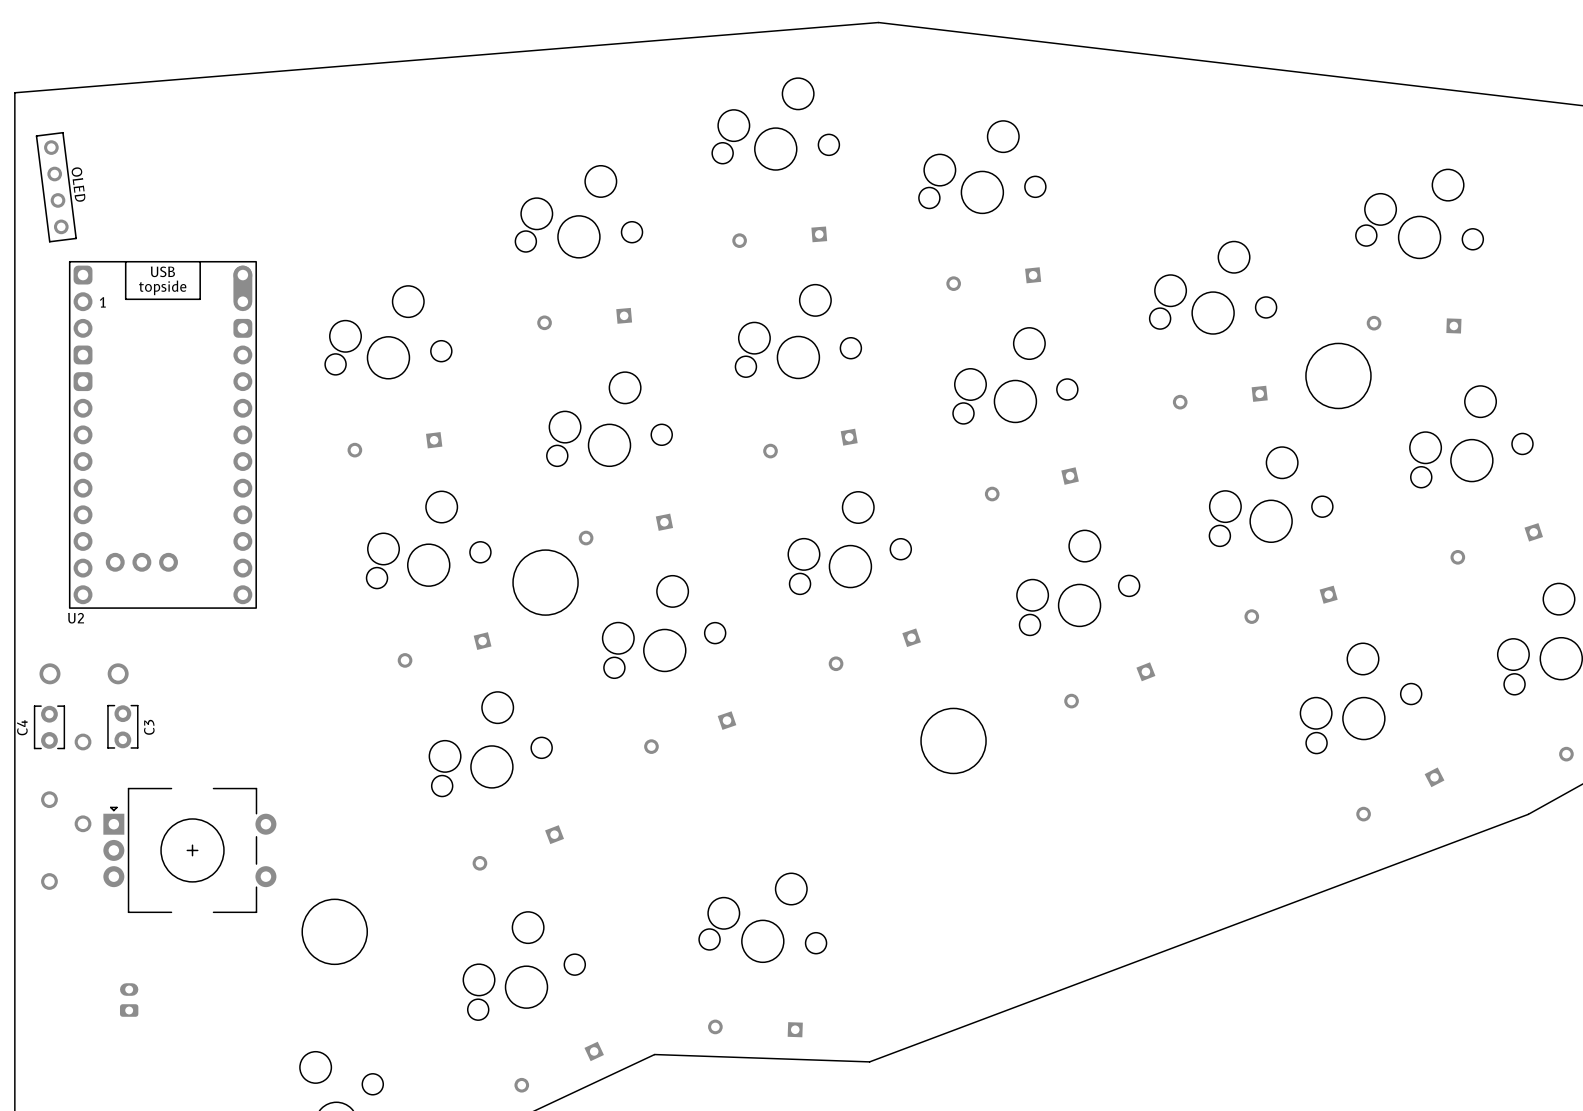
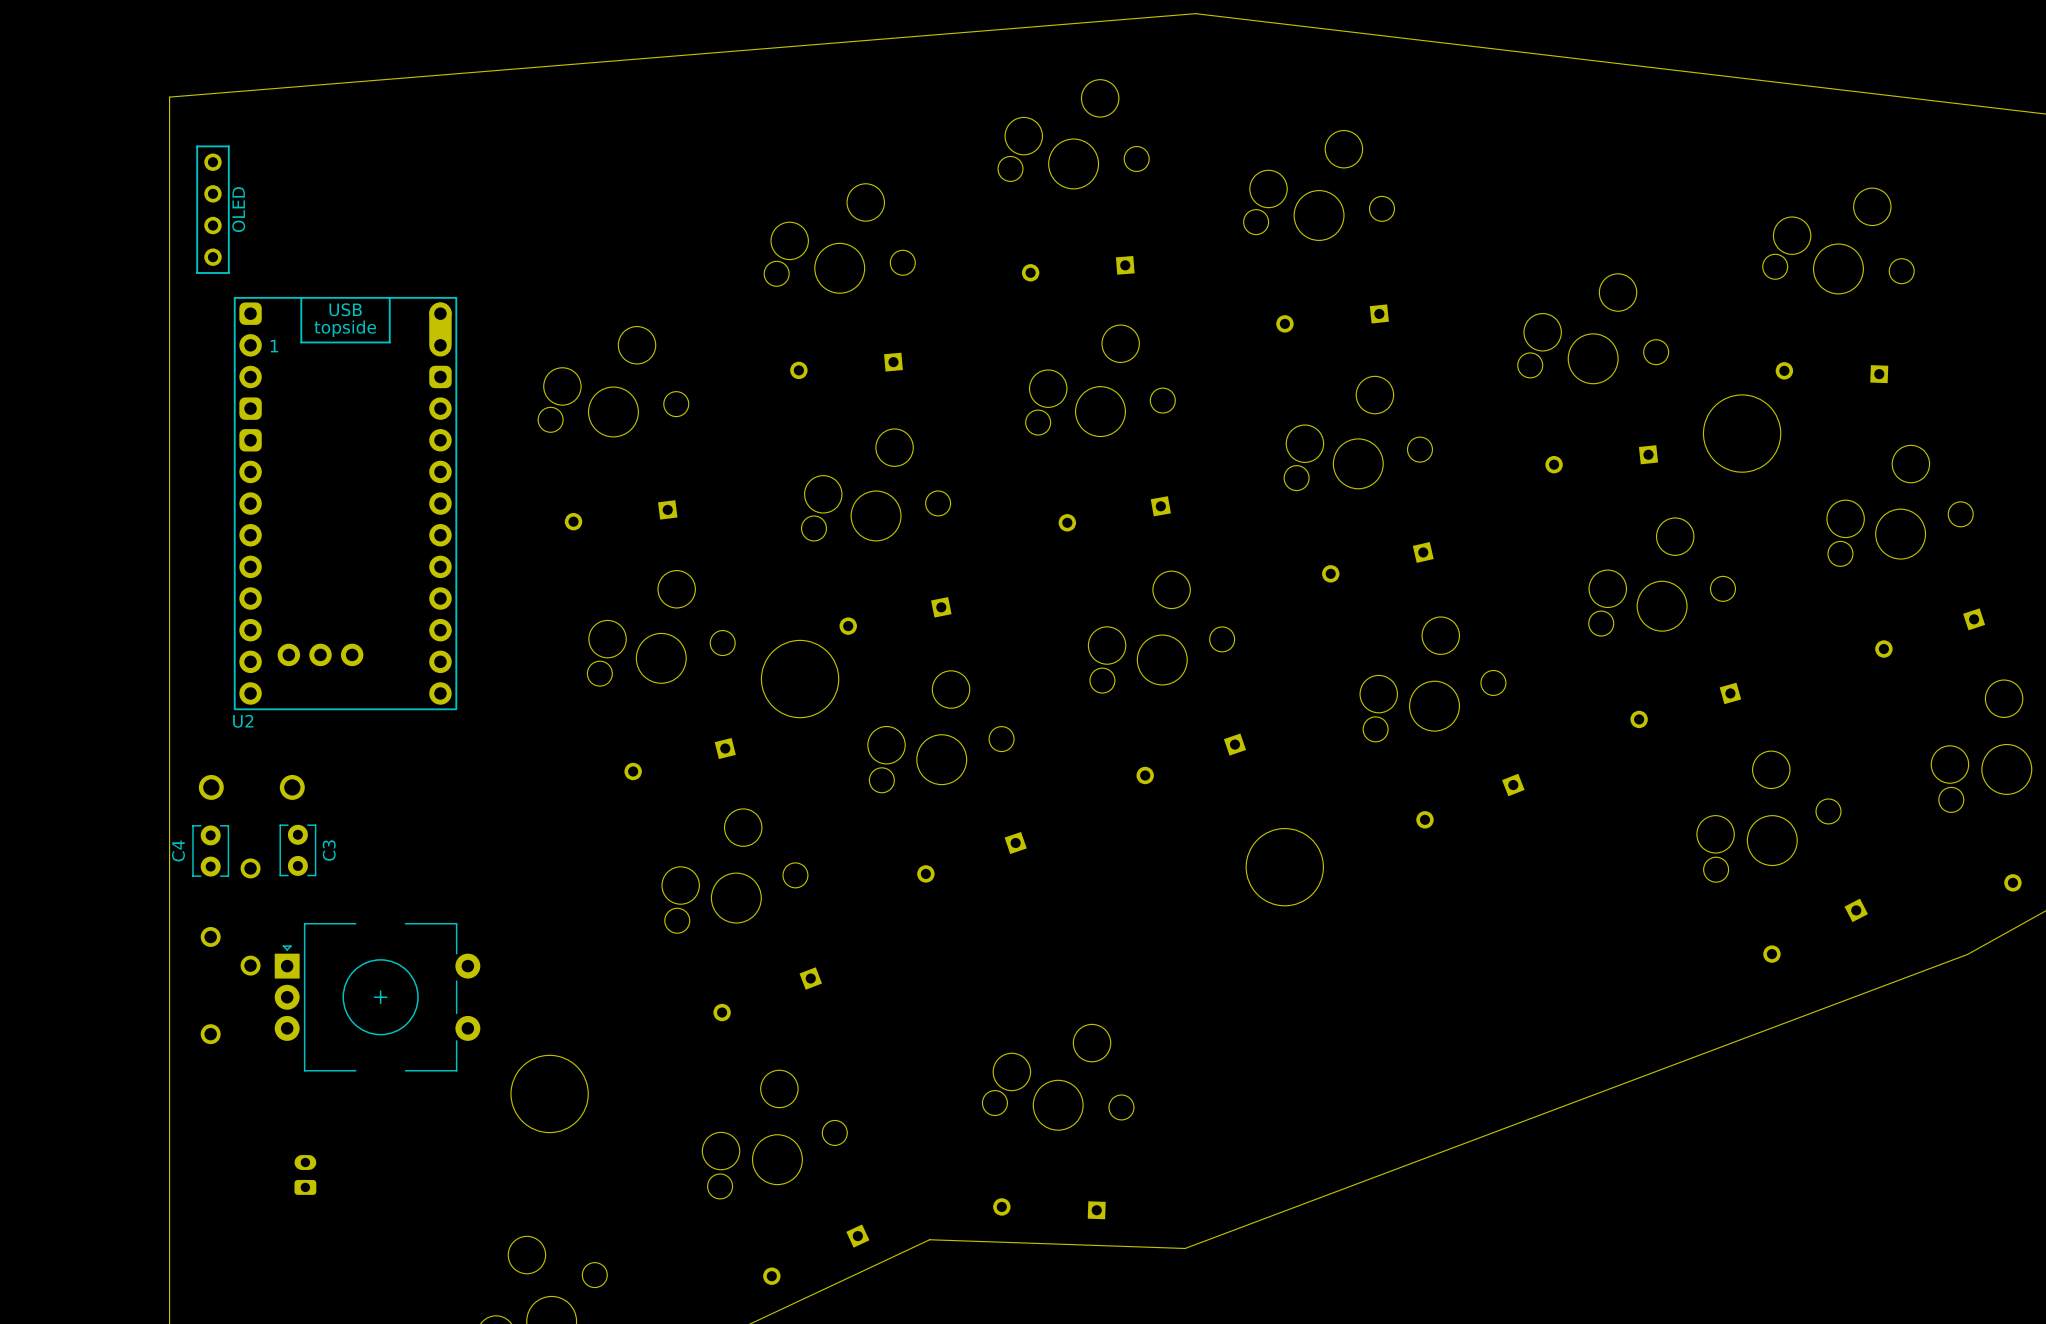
part rotation: 0° (56, 187) -> 7.1° clockwise (212, 209)

